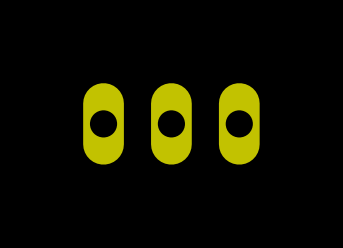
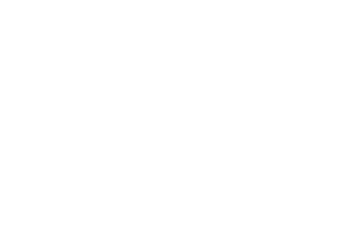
part: (171, 123) -> none

